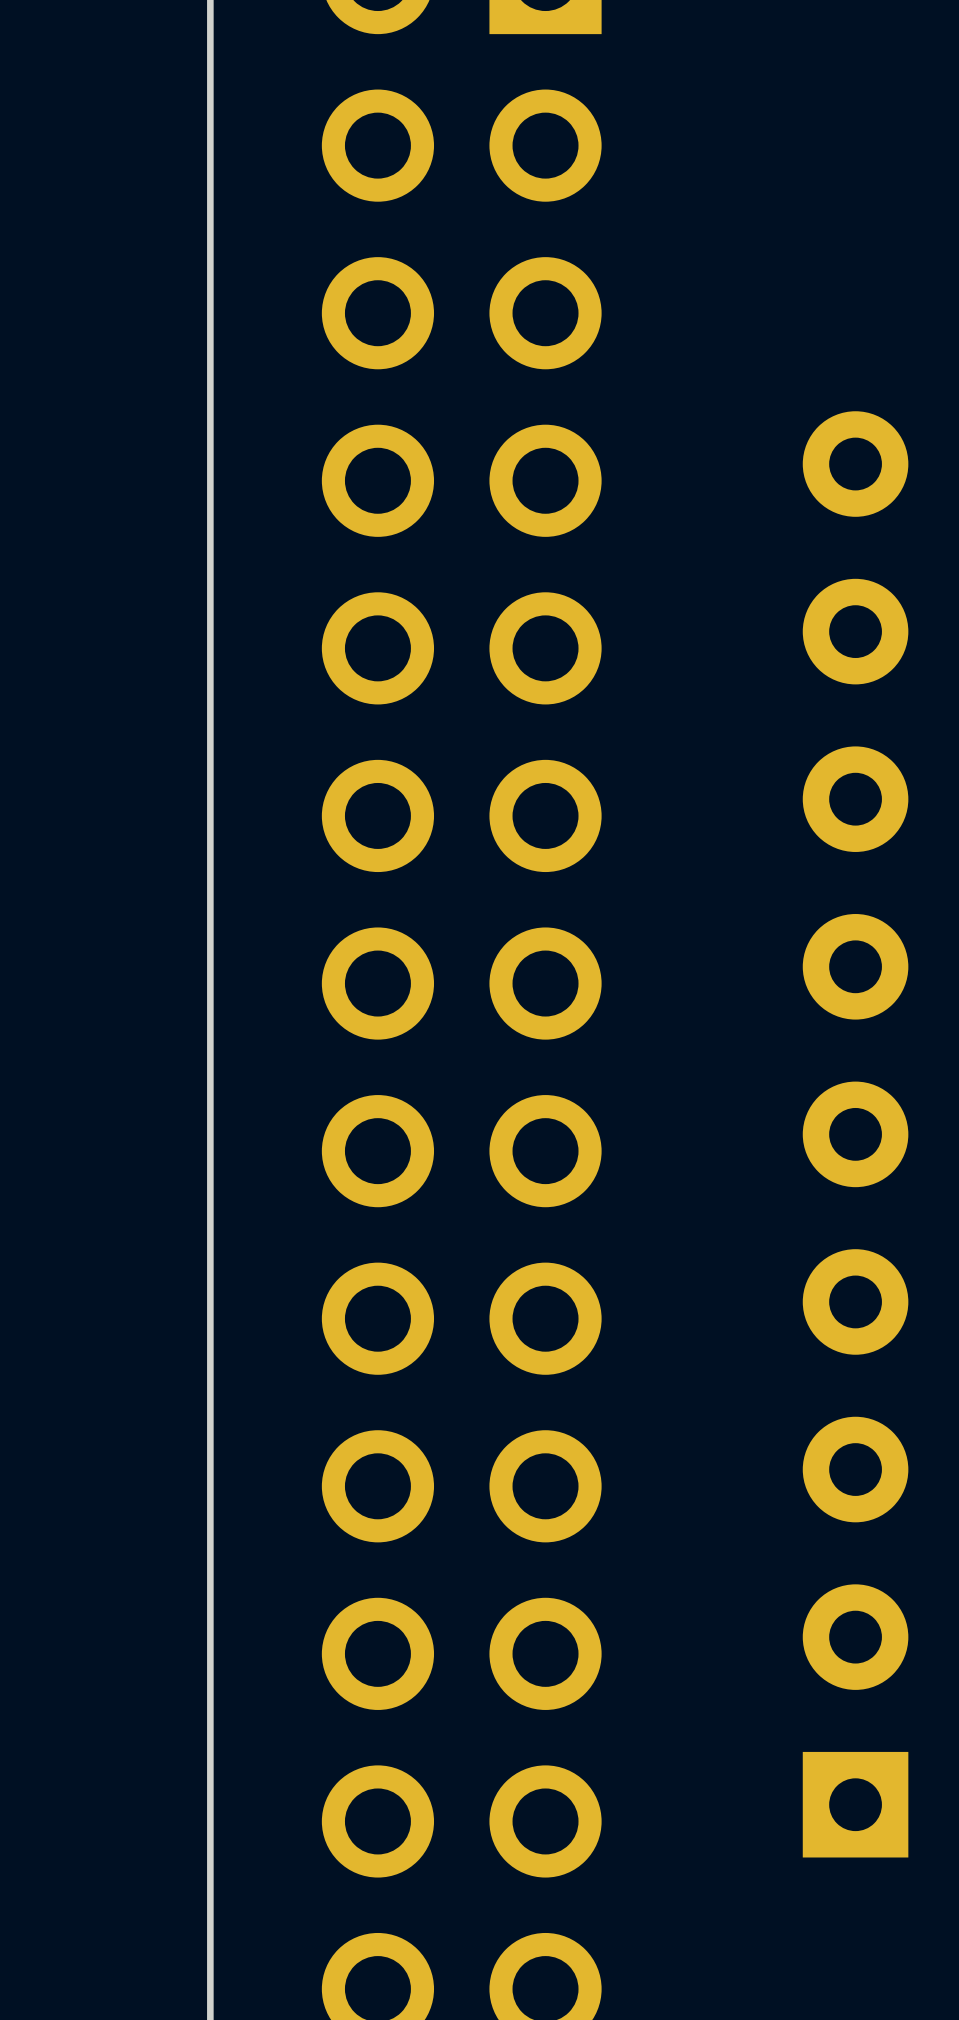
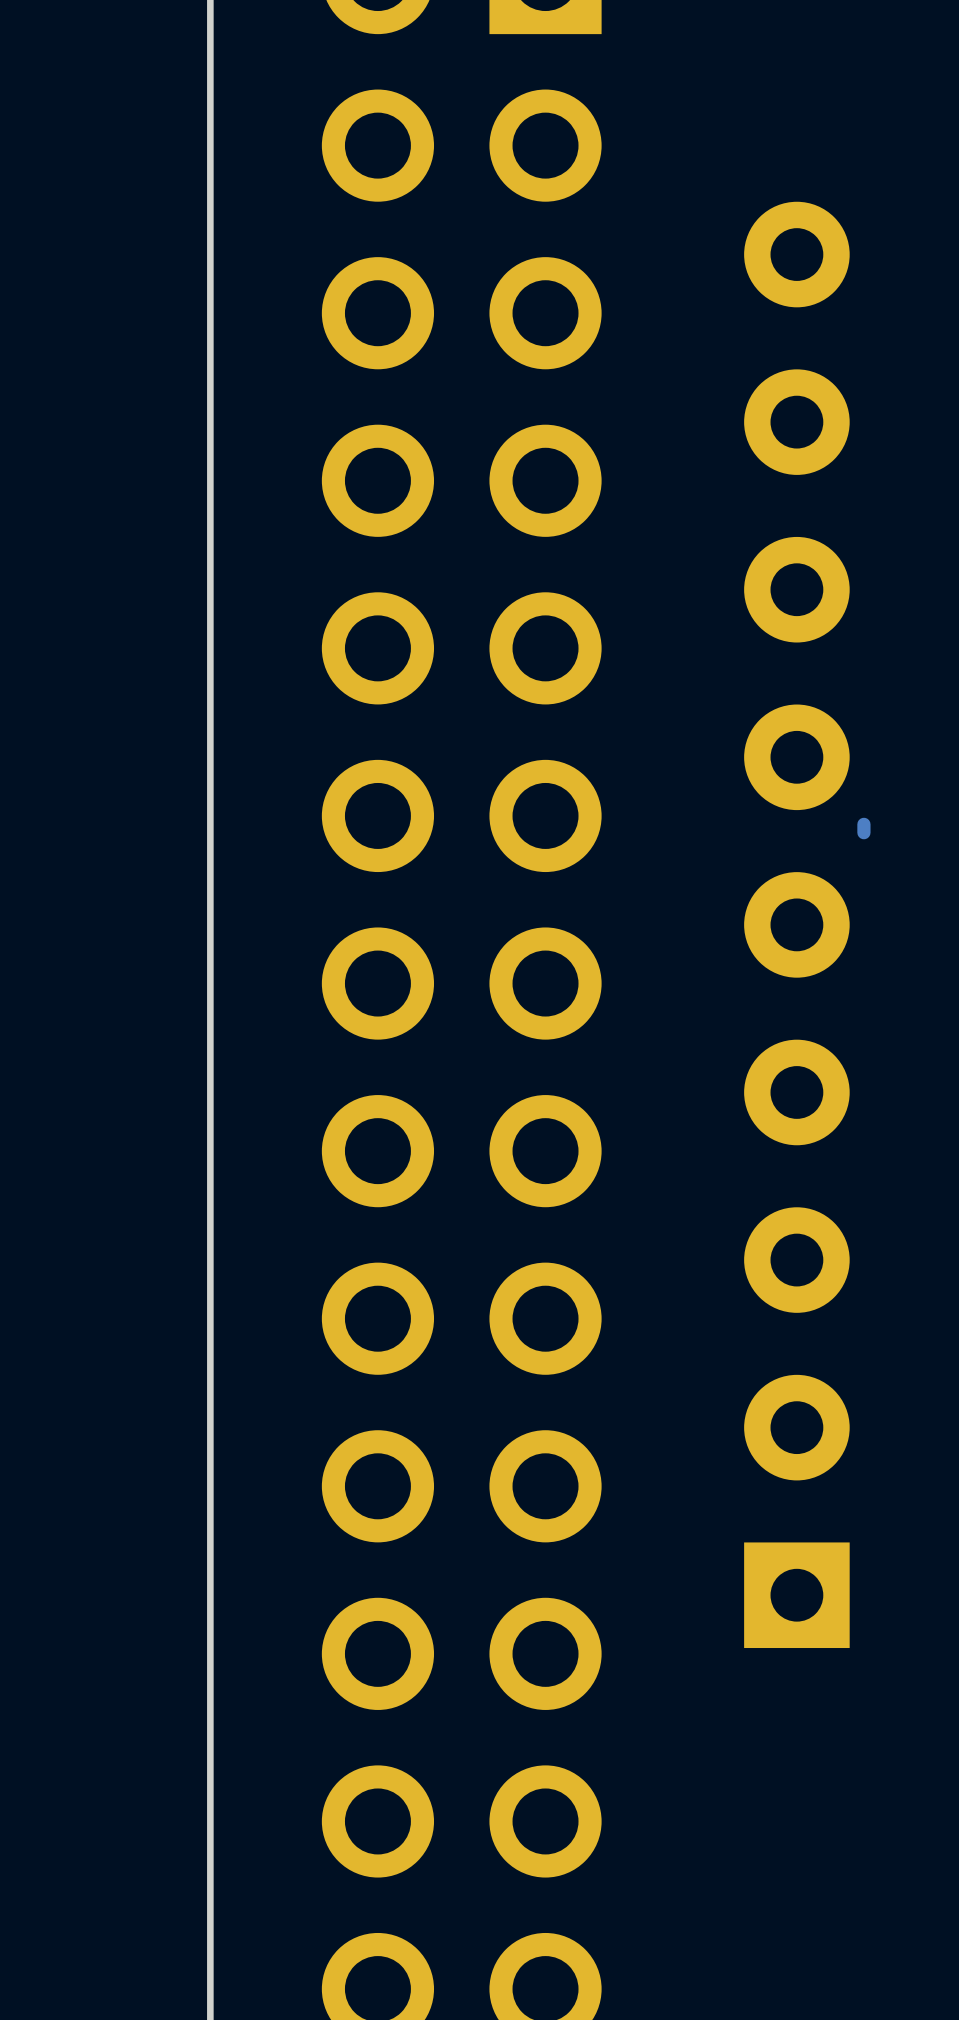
part position: (855, 1134) -> (796, 924)

